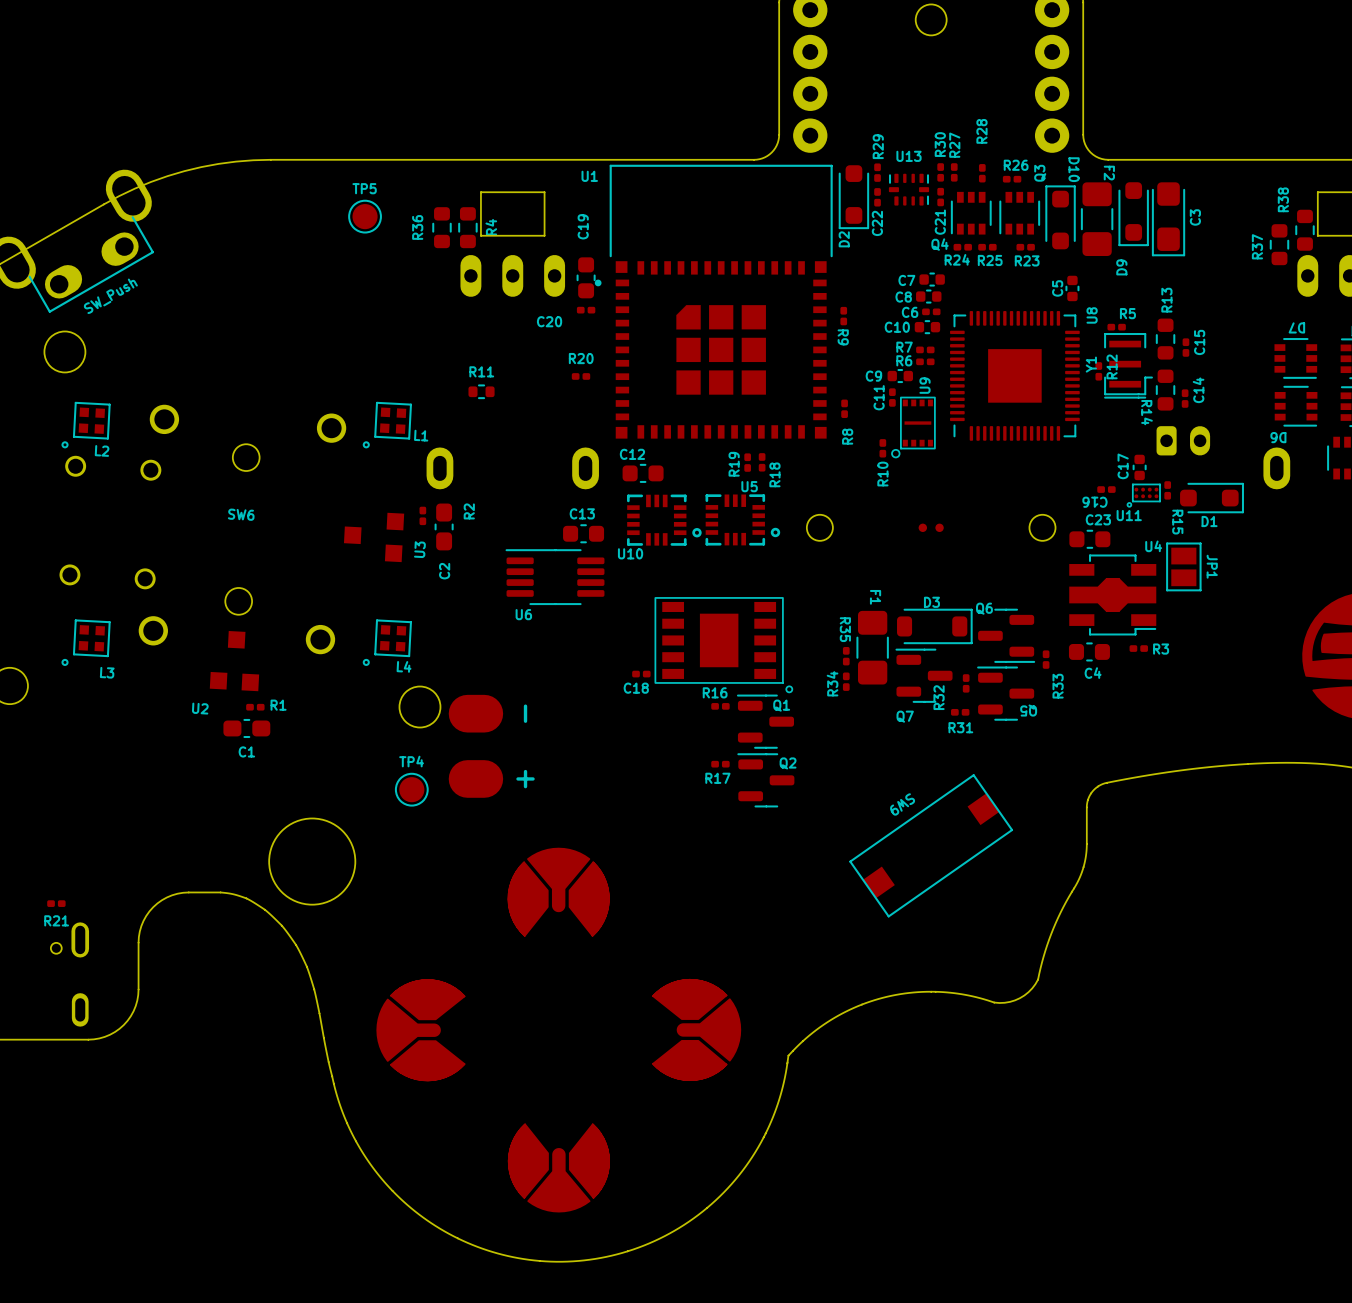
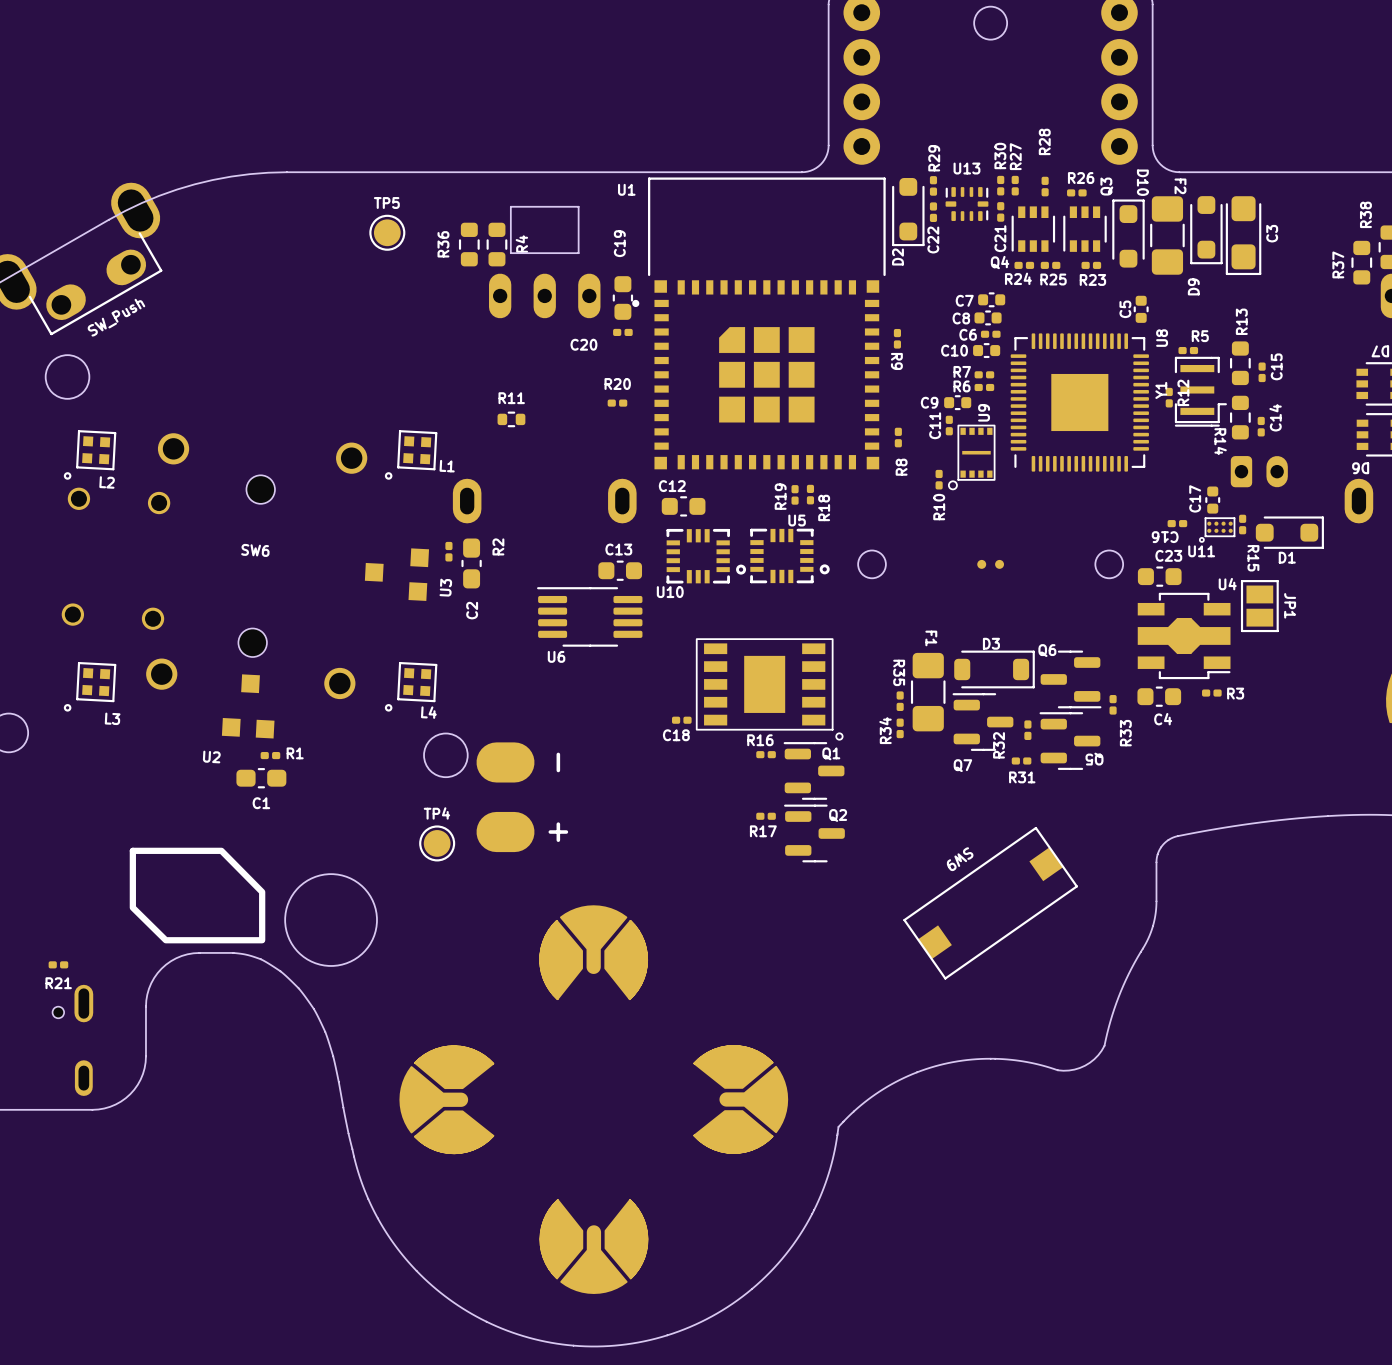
drawing: none -> [129, 847, 266, 944]

